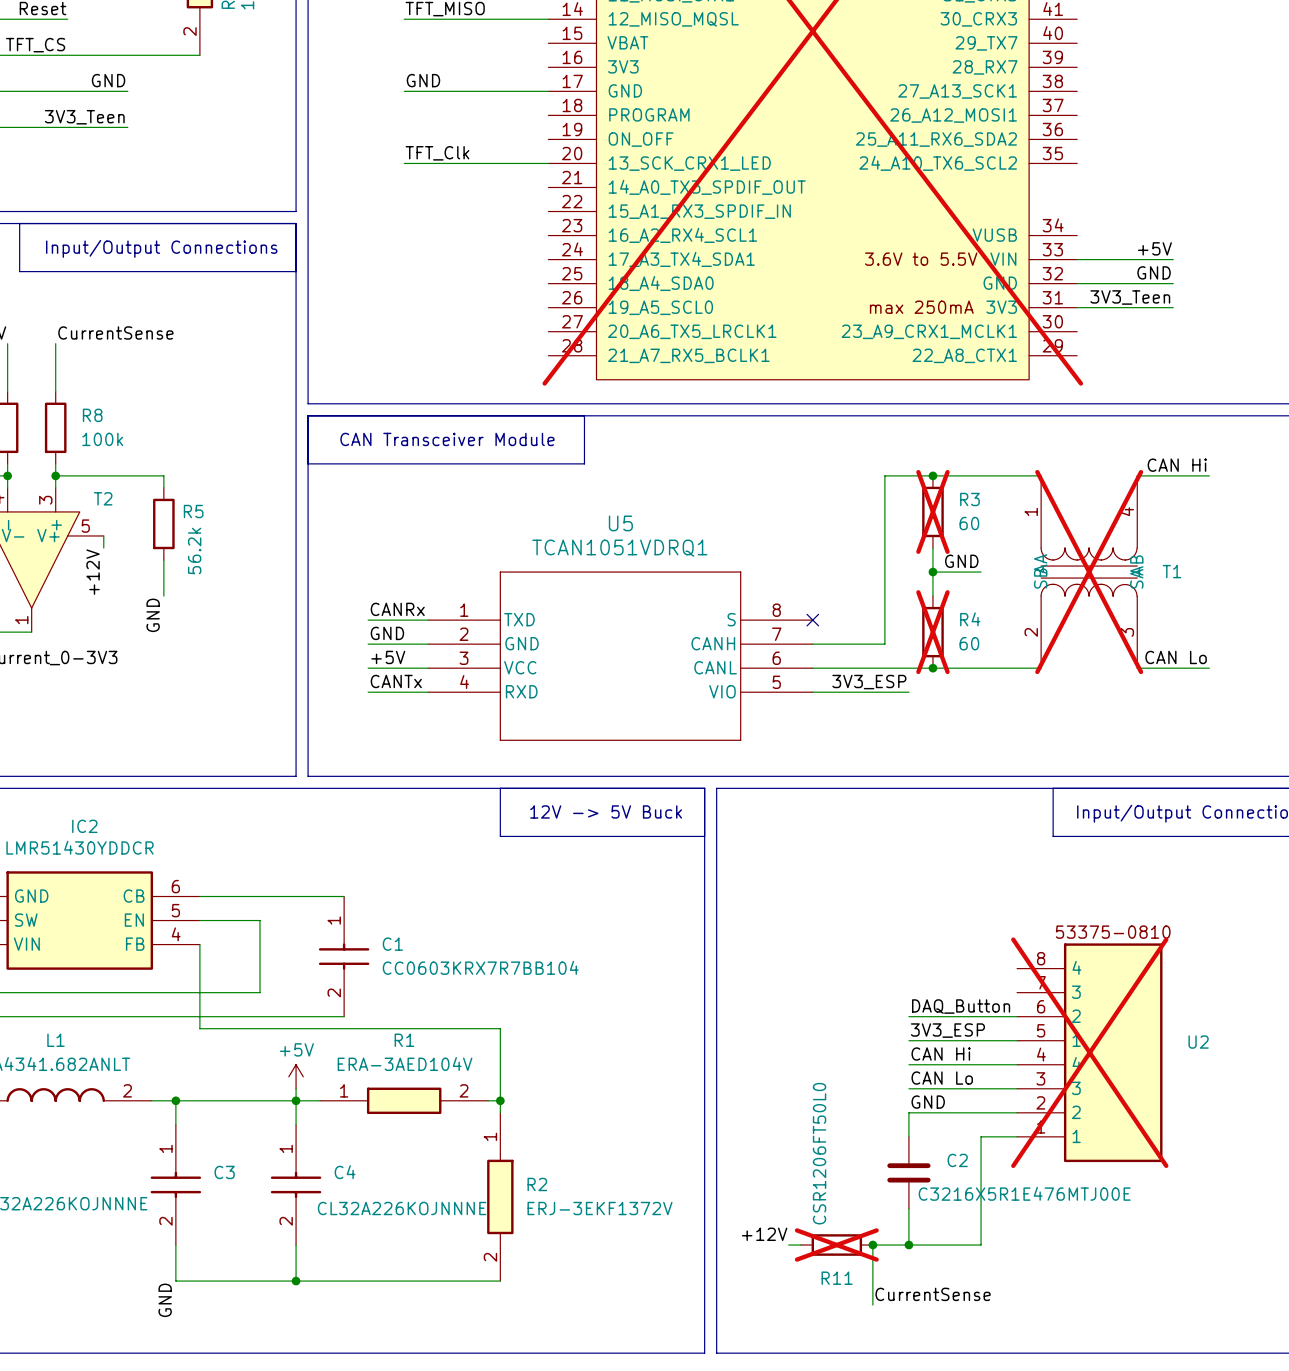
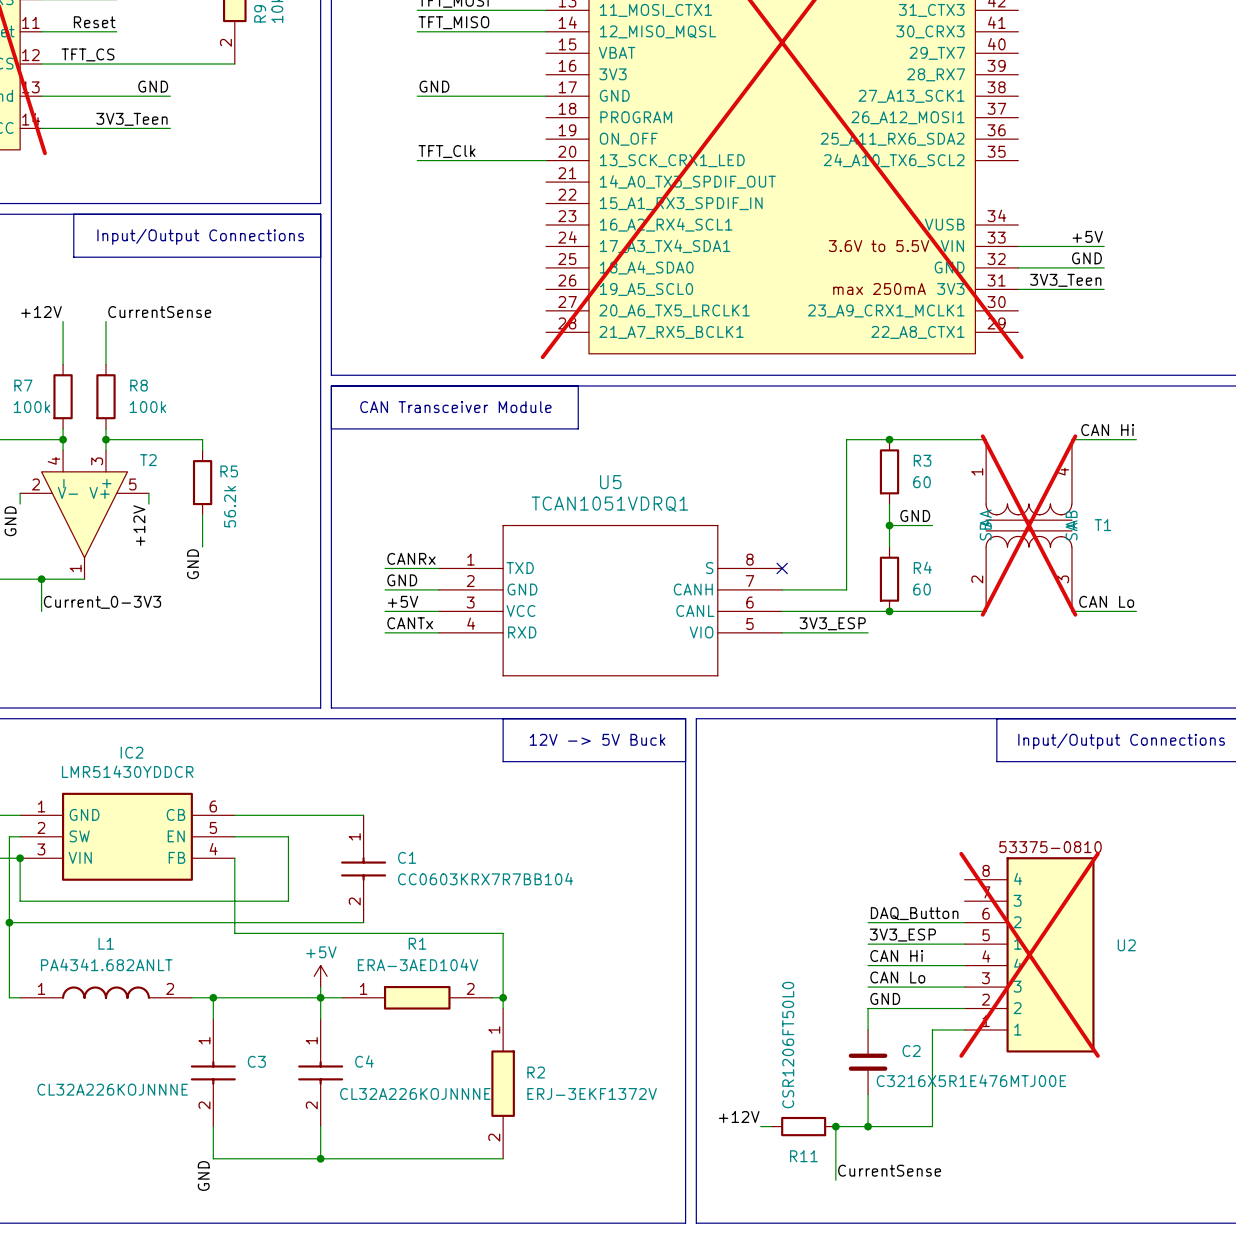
R3 do-not-place cross: (932, 511) -> none
R4 do-not-place cross: (932, 632) -> none
R11 do-not-place cross: (836, 1245) -> none

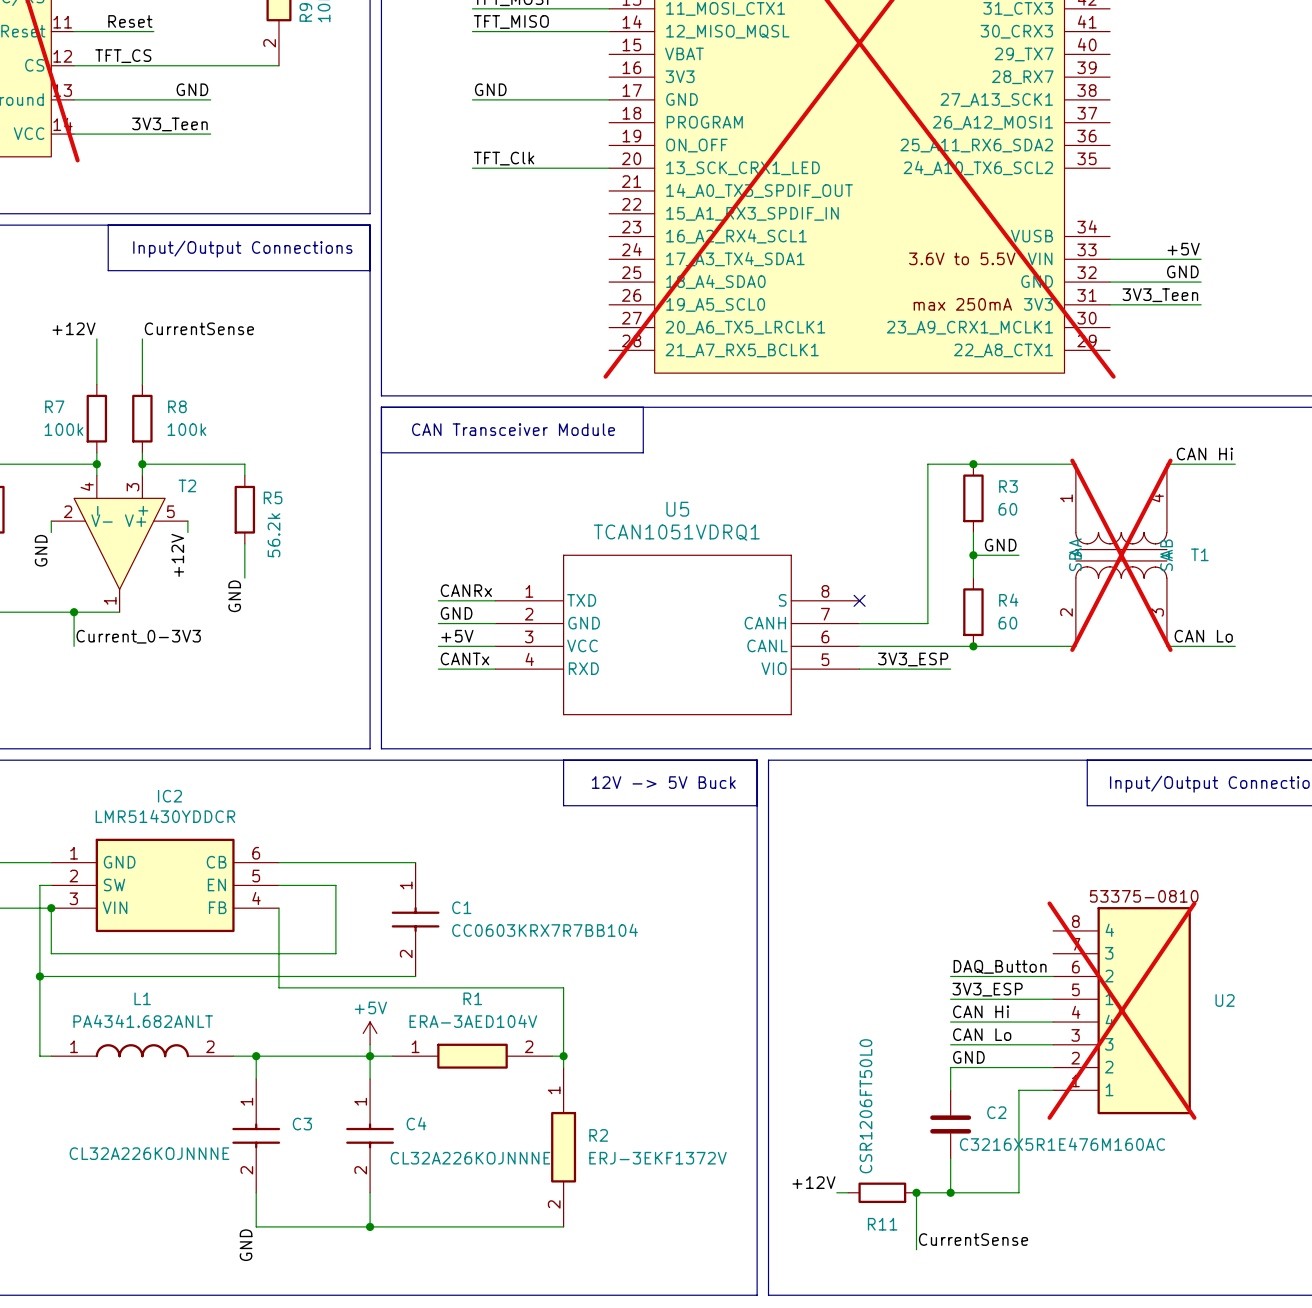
C2 value: C3216X5R1E476MTJ00E (971, 1080) -> C3216X5R1E476M160AC (1062, 1144)

